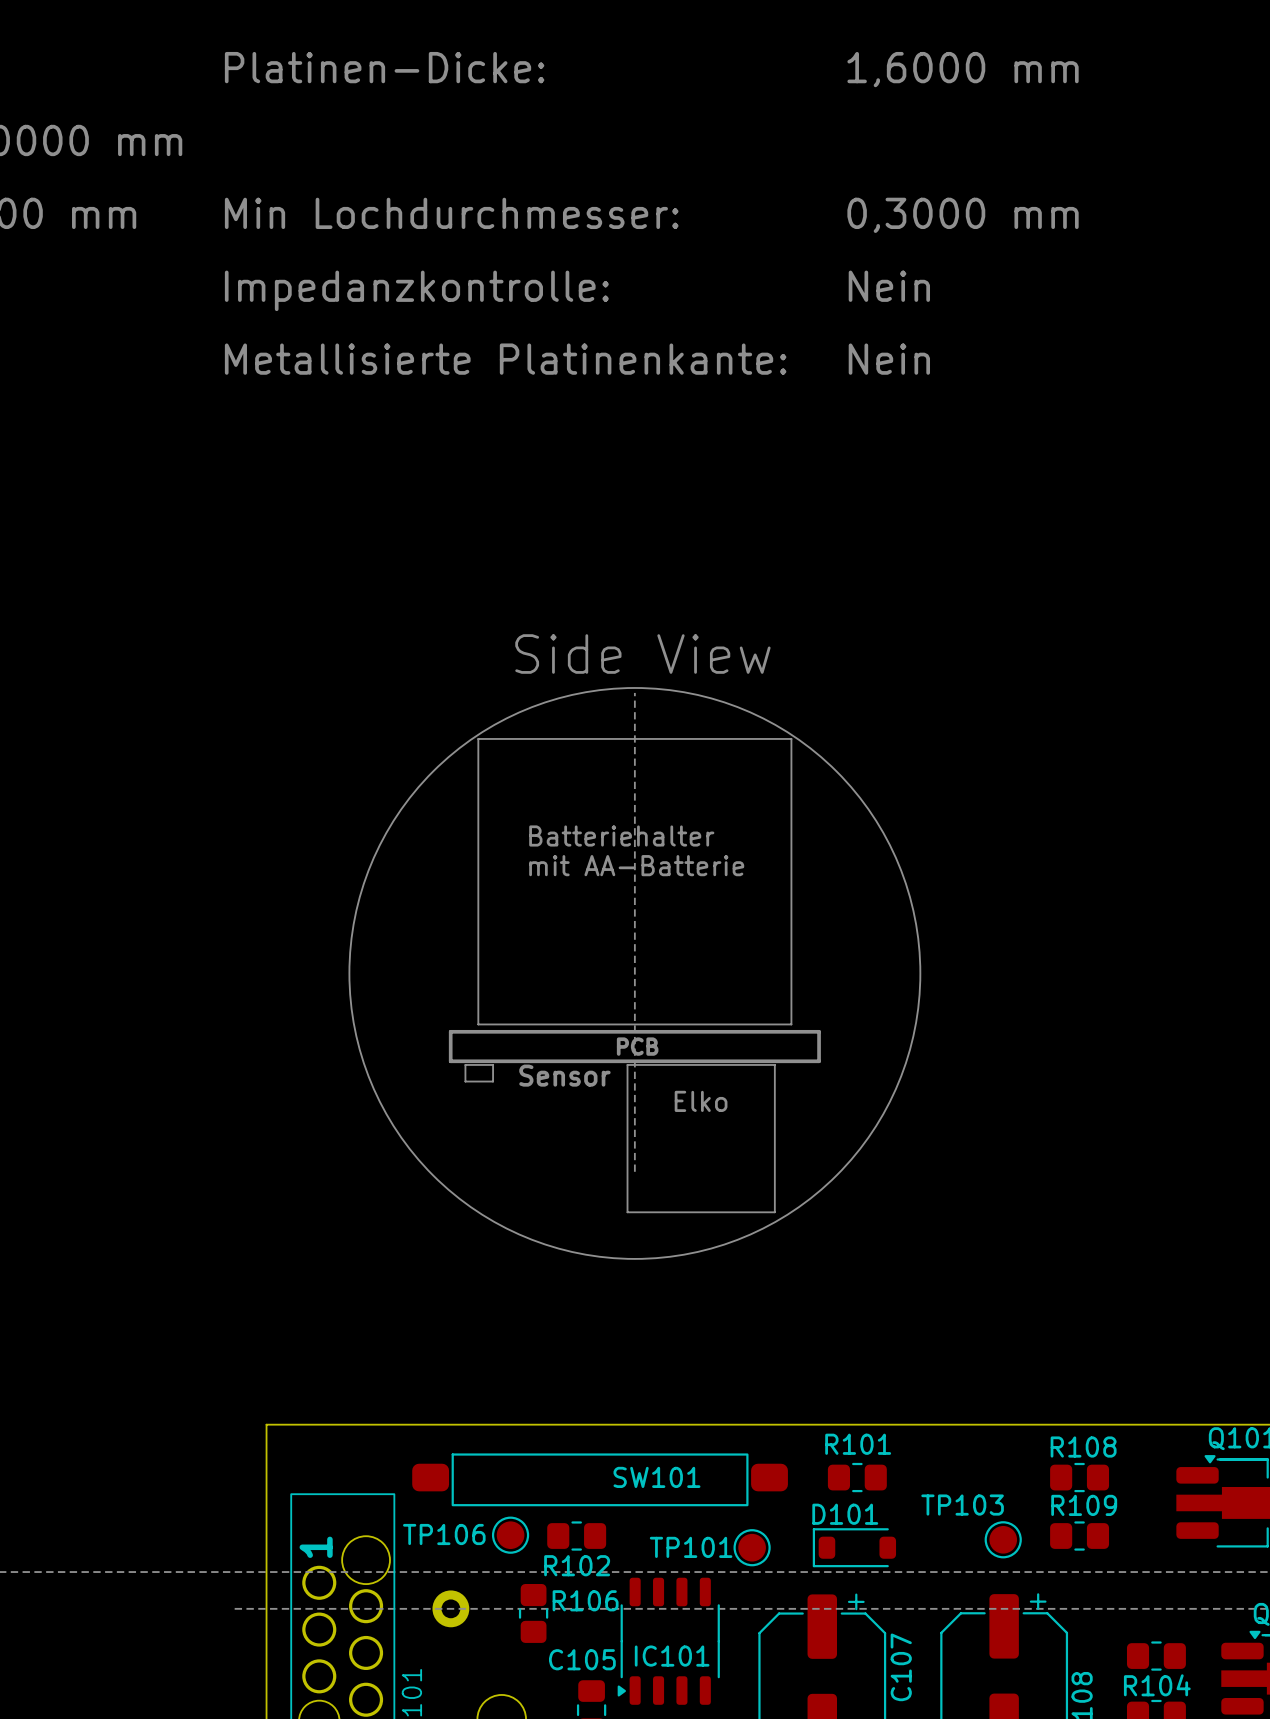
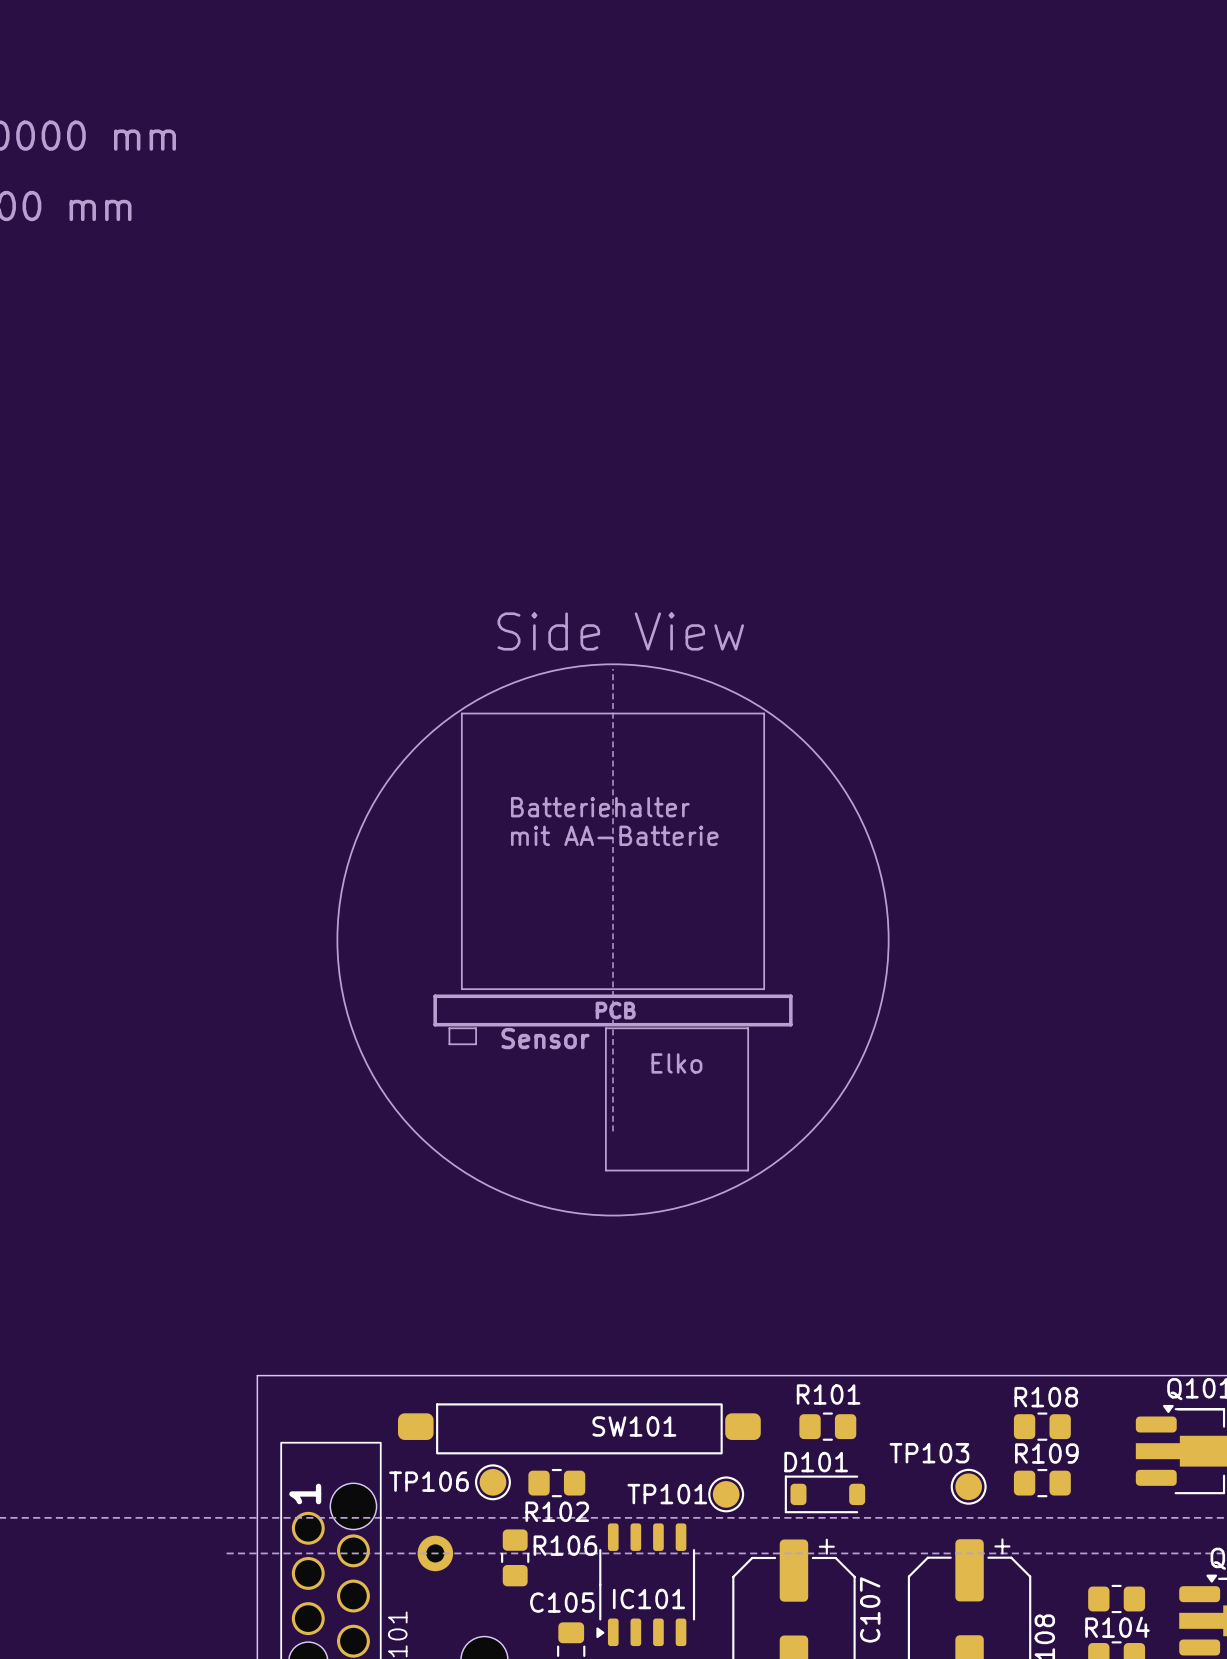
text: Platinen-Dicke: (384, 67) -> none
text: 1,6000 mm (963, 69) -> none
text: Min Lochdurchmesser: (451, 213) -> none
text: 0,3000 mm (963, 215) -> none
text: Nein (889, 286) -> none
text: Impedanzkontrolle: (416, 290) -> none
text: Metallisierte Platinenkante: (505, 359) -> none
text: Nein (889, 359) -> none

